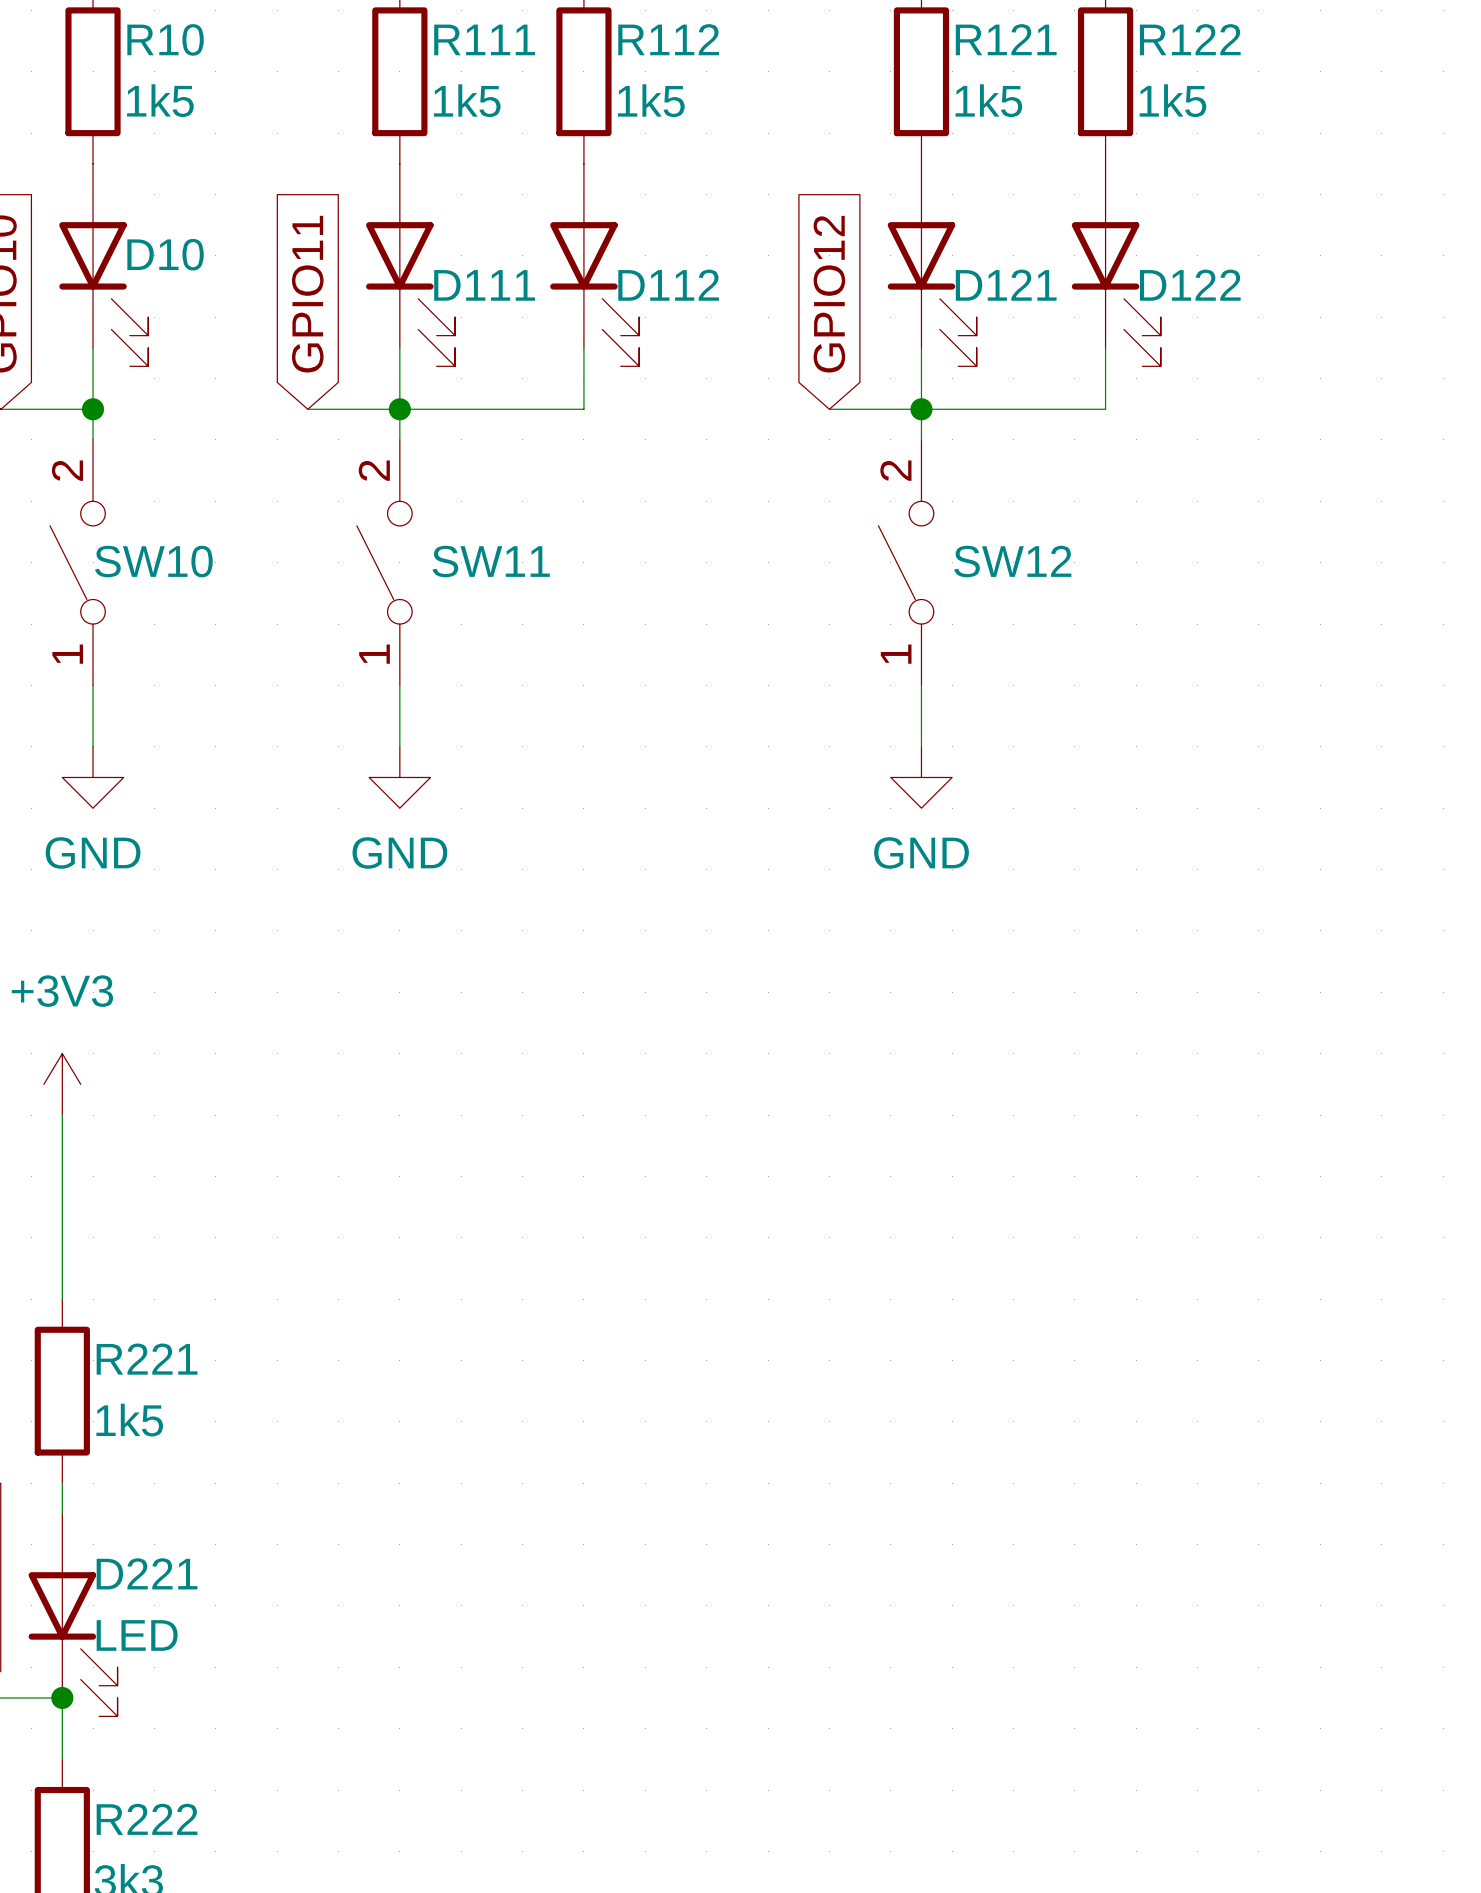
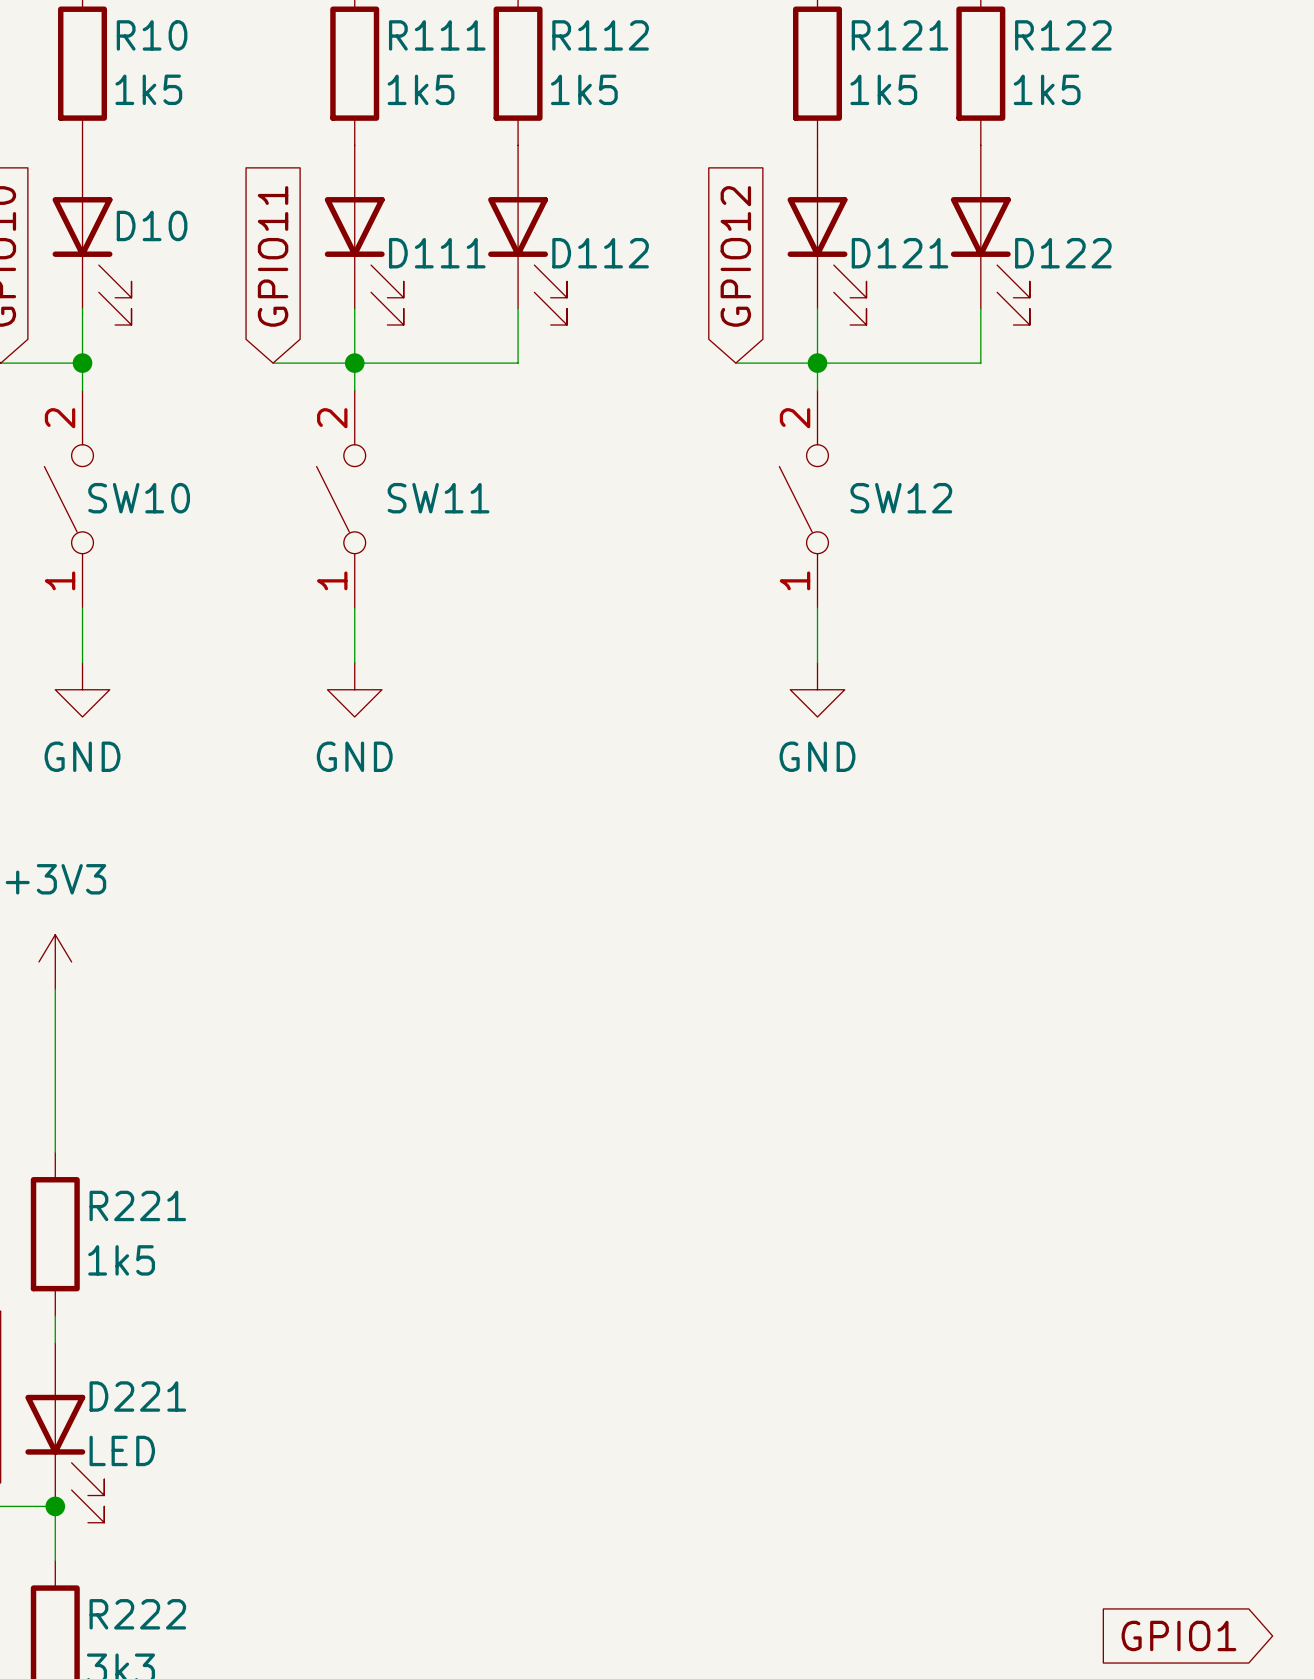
global label: none -> GPIO1 (1178, 1635)

